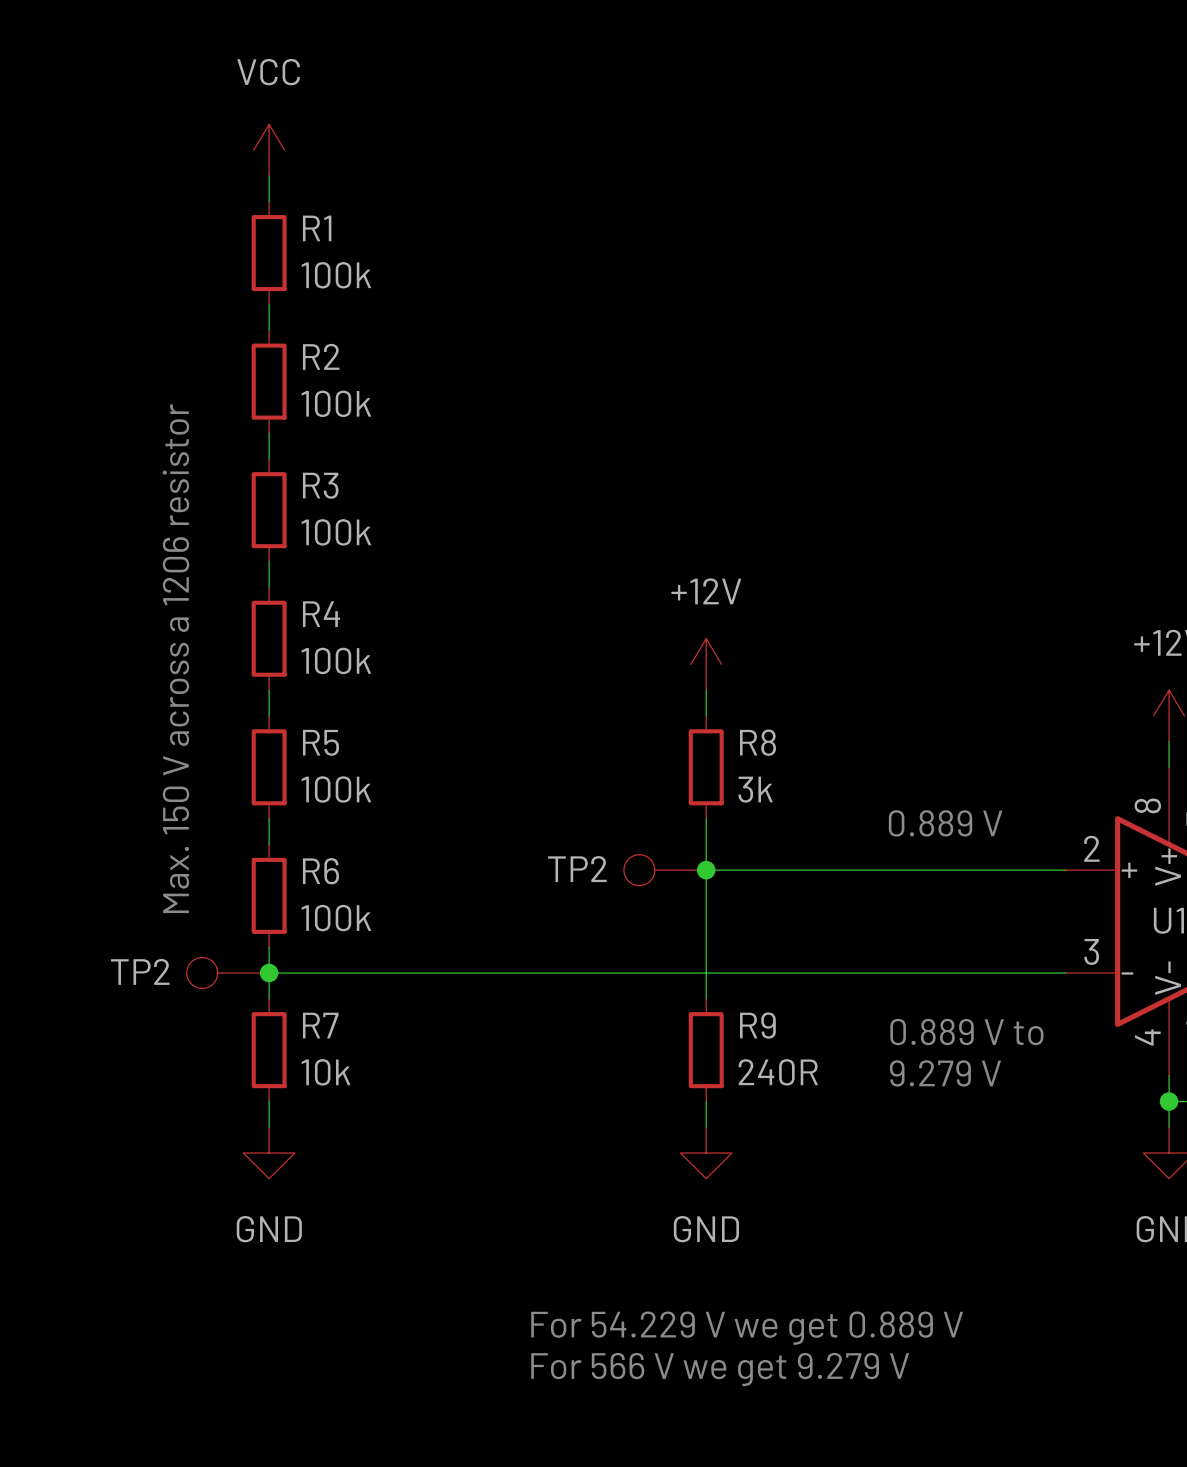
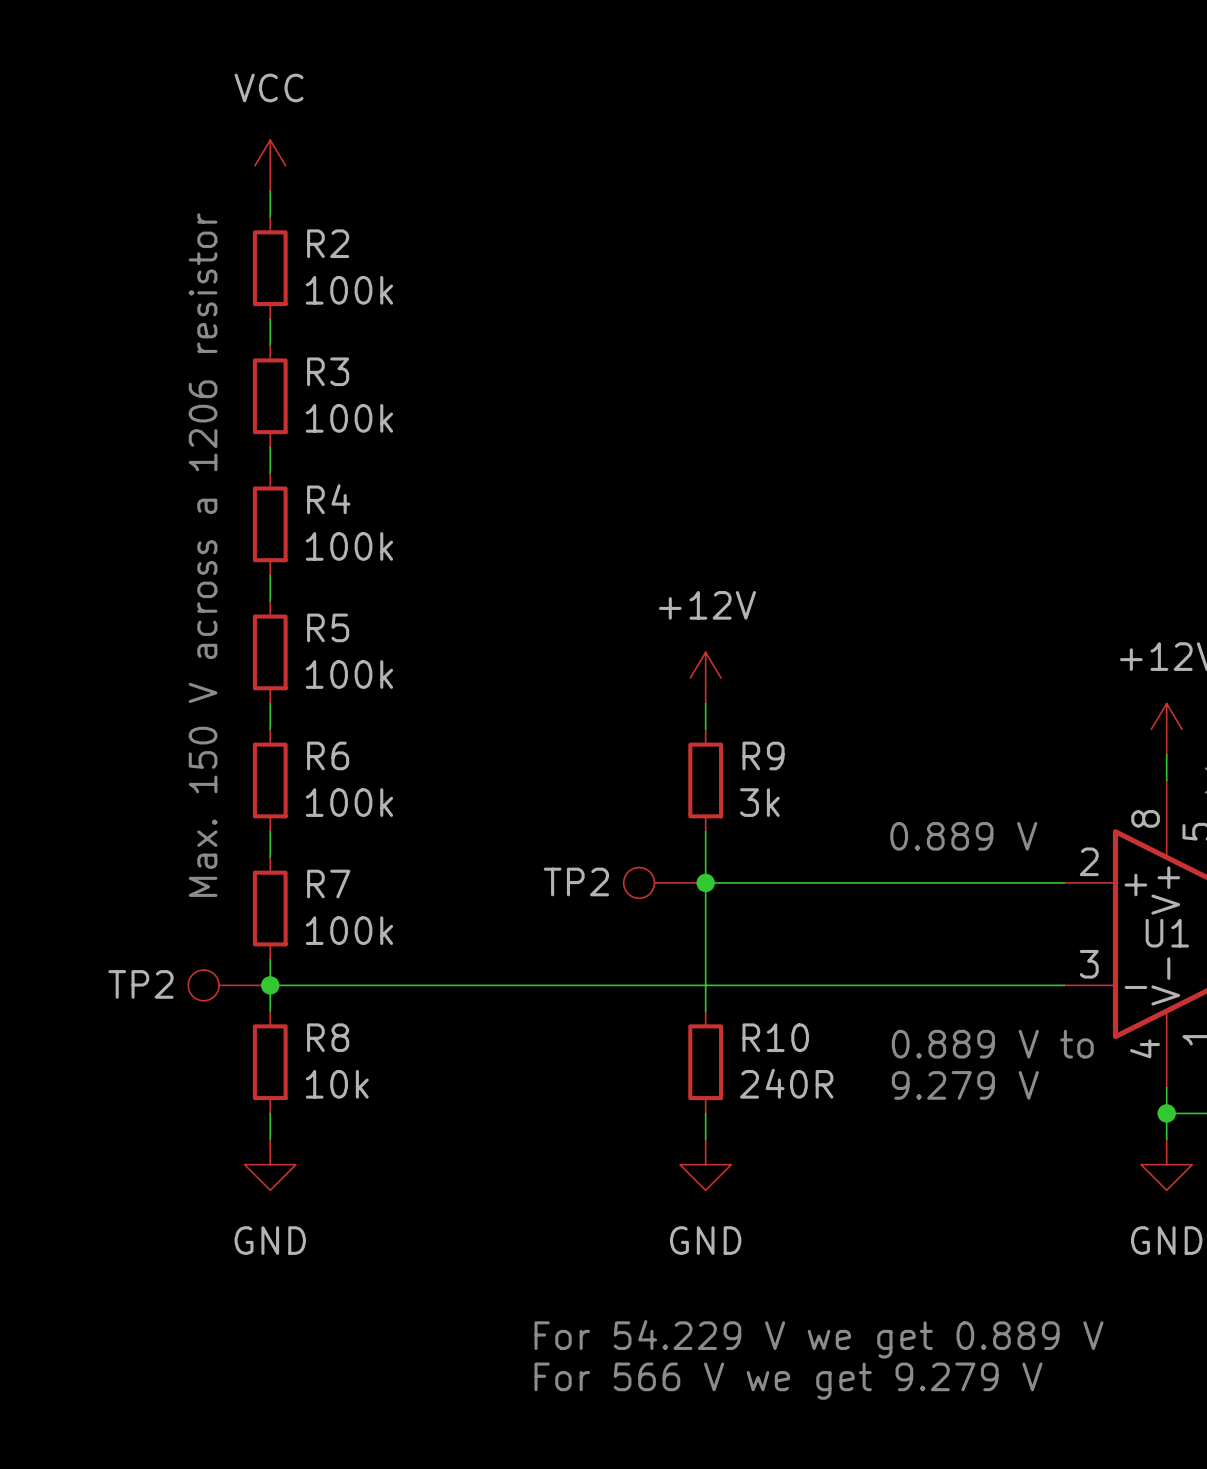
R1 name: R1 (317, 228) -> R2 (328, 243)
R2 name: R2 (321, 356) -> R3 (328, 371)
R3 name: R3 (320, 485) -> R4 (328, 499)
R4 name: R4 (321, 614) -> R5 (328, 627)
text position: Max. 150 V across a 1206 resistor (175, 658) -> Max. 150 V across a 1206 resistor (203, 555)
R5 name: R5 (320, 742) -> R6 (328, 755)
R8 name: R8 (757, 742) -> R9 (763, 755)
R6 name: R6 (320, 871) -> R7 (328, 884)
R7 name: R7 (320, 1025) -> R8 (328, 1037)
R9 name: R9 (757, 1025) -> R10 (775, 1037)

